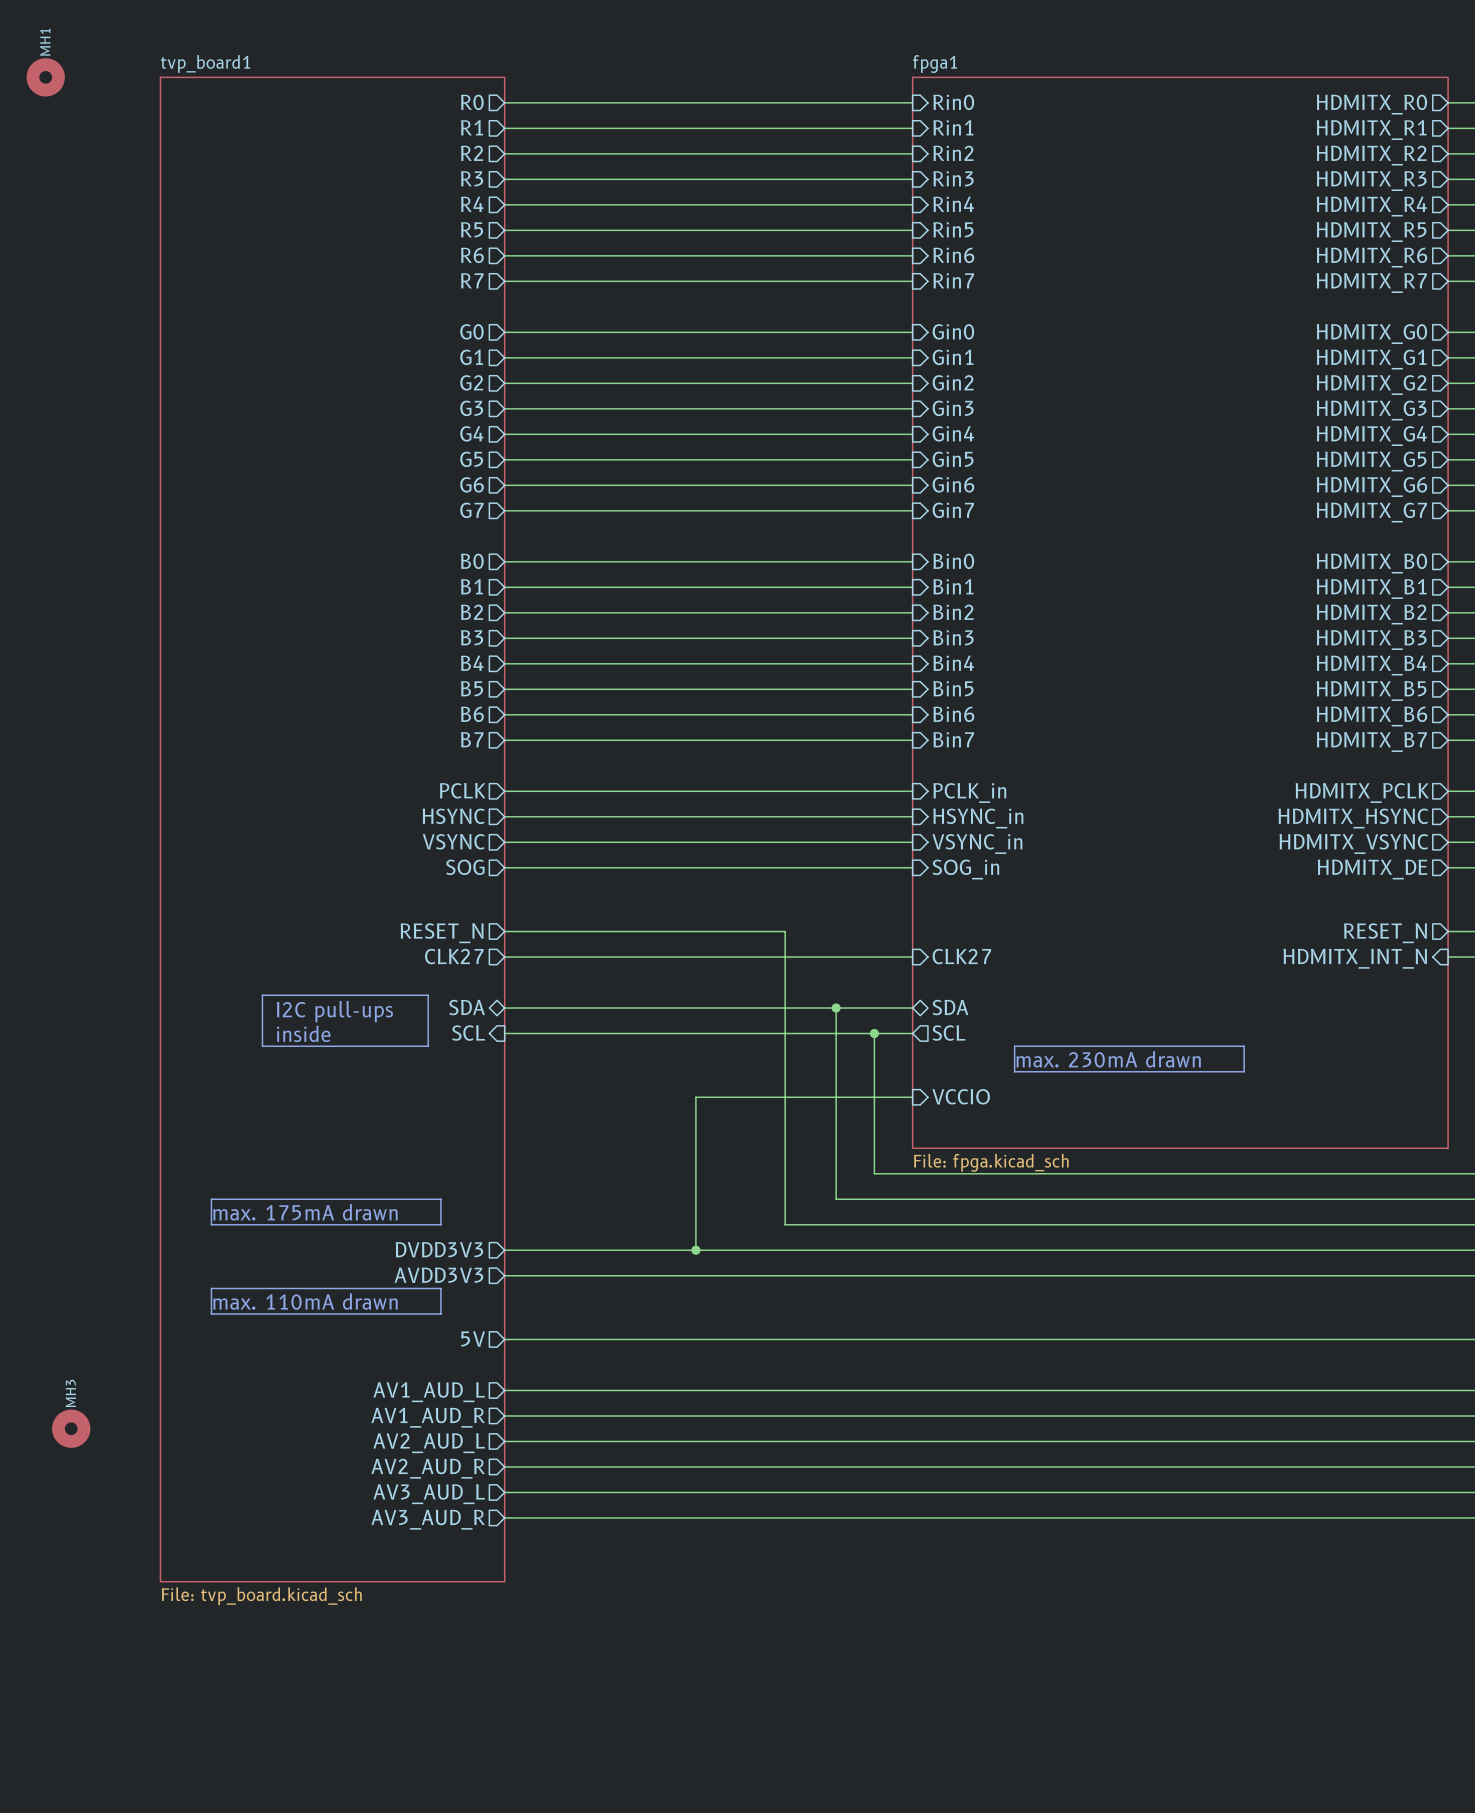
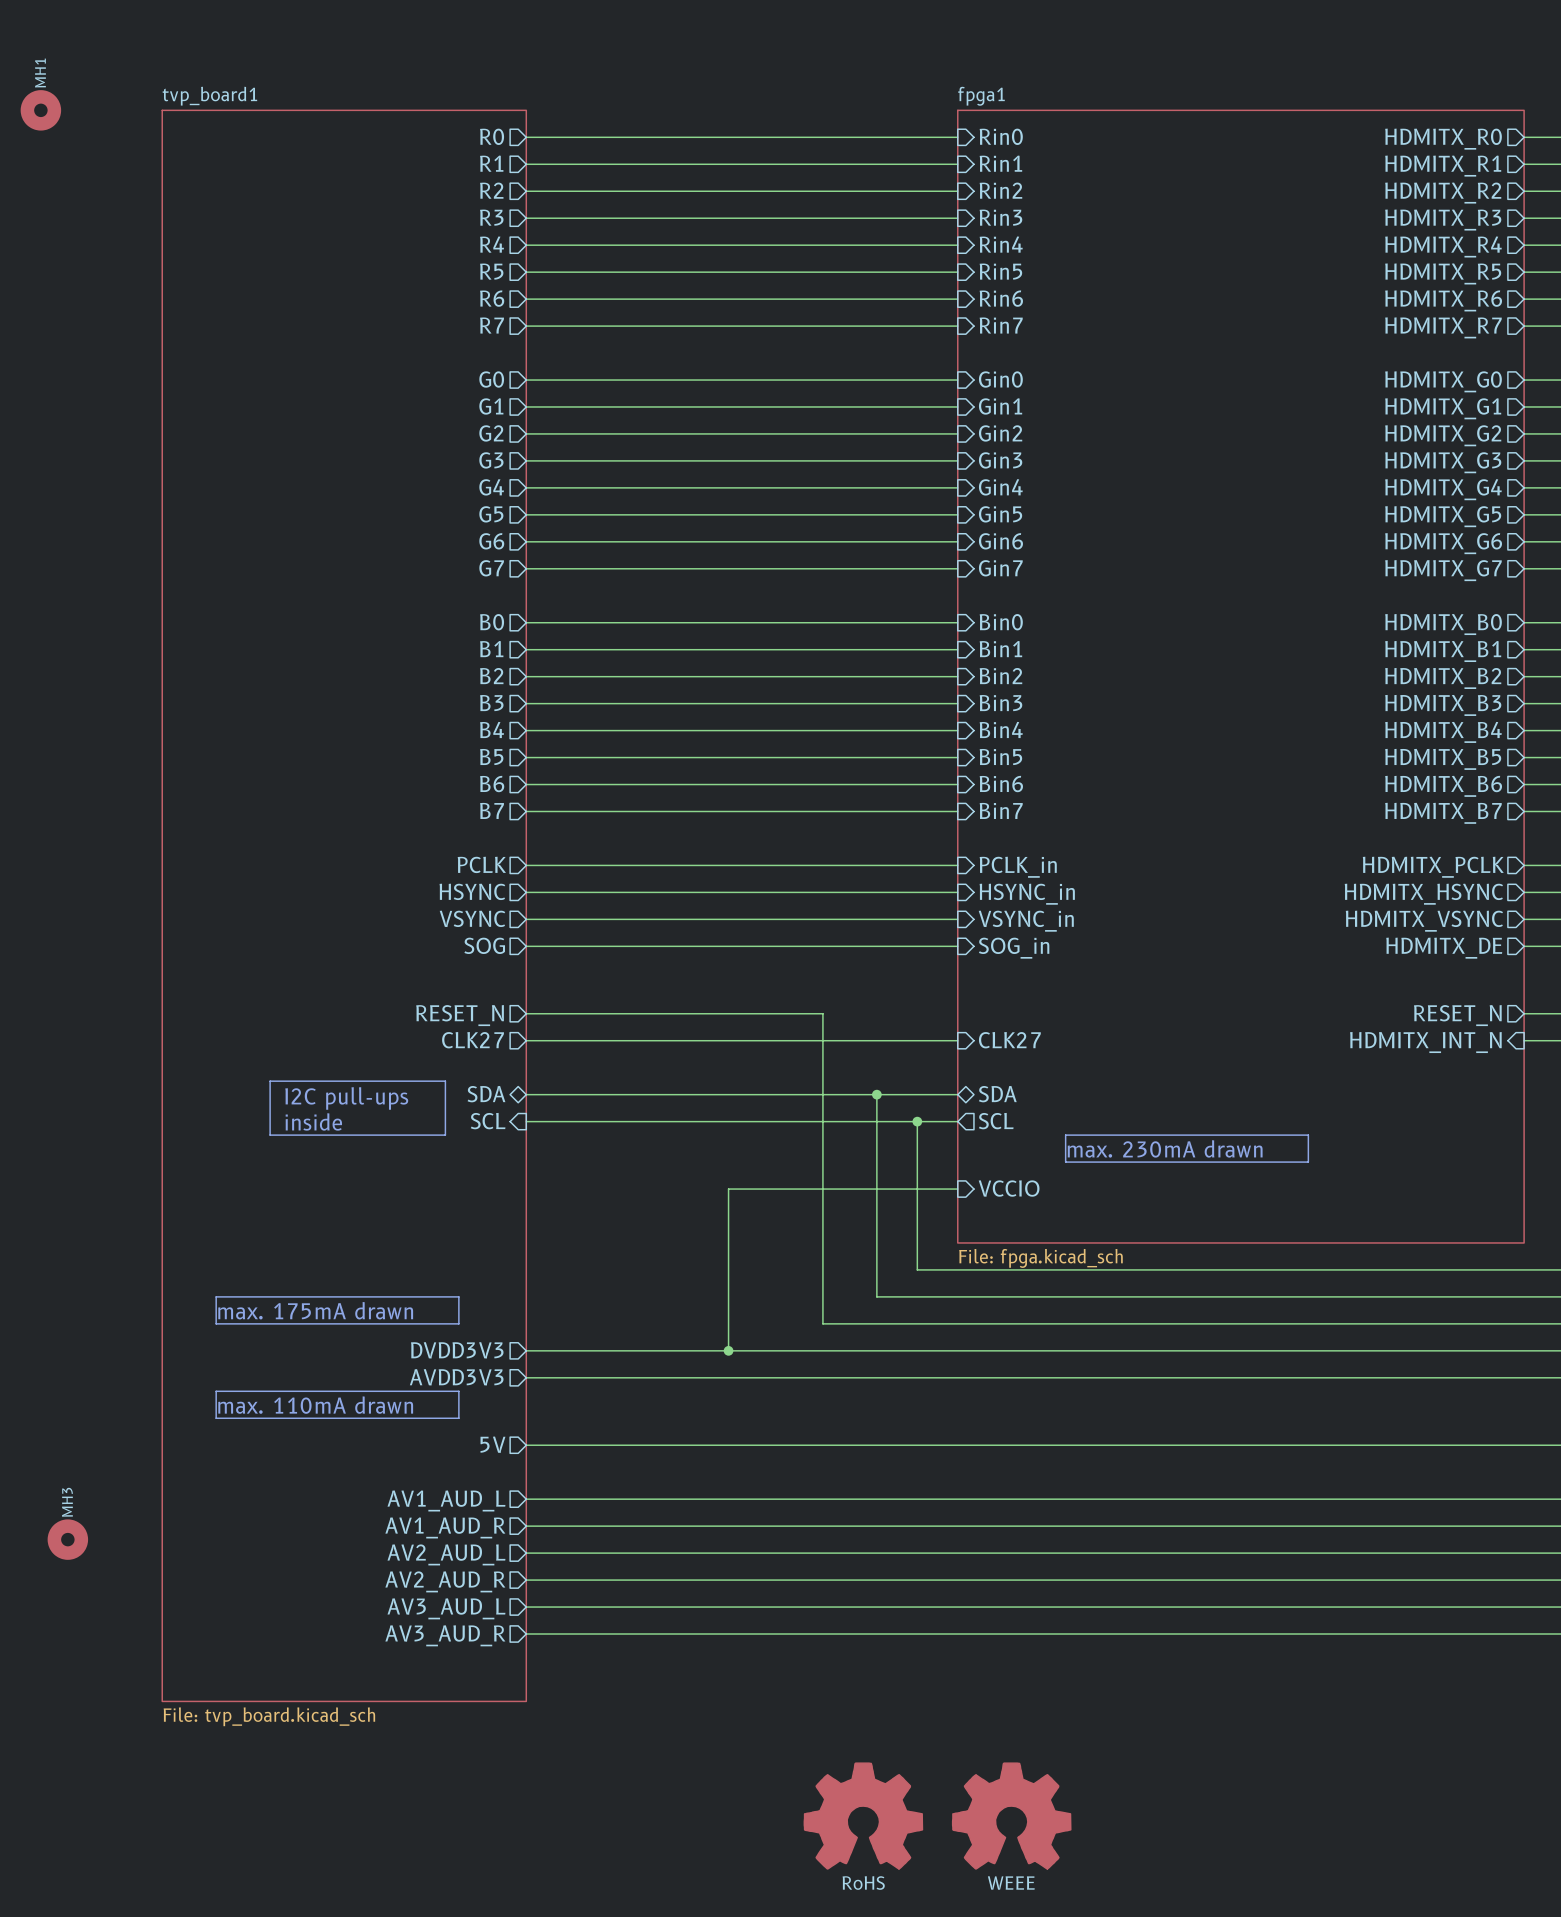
part: none -> RoHS (863, 1816)
part: none -> WEEE (1011, 1816)

